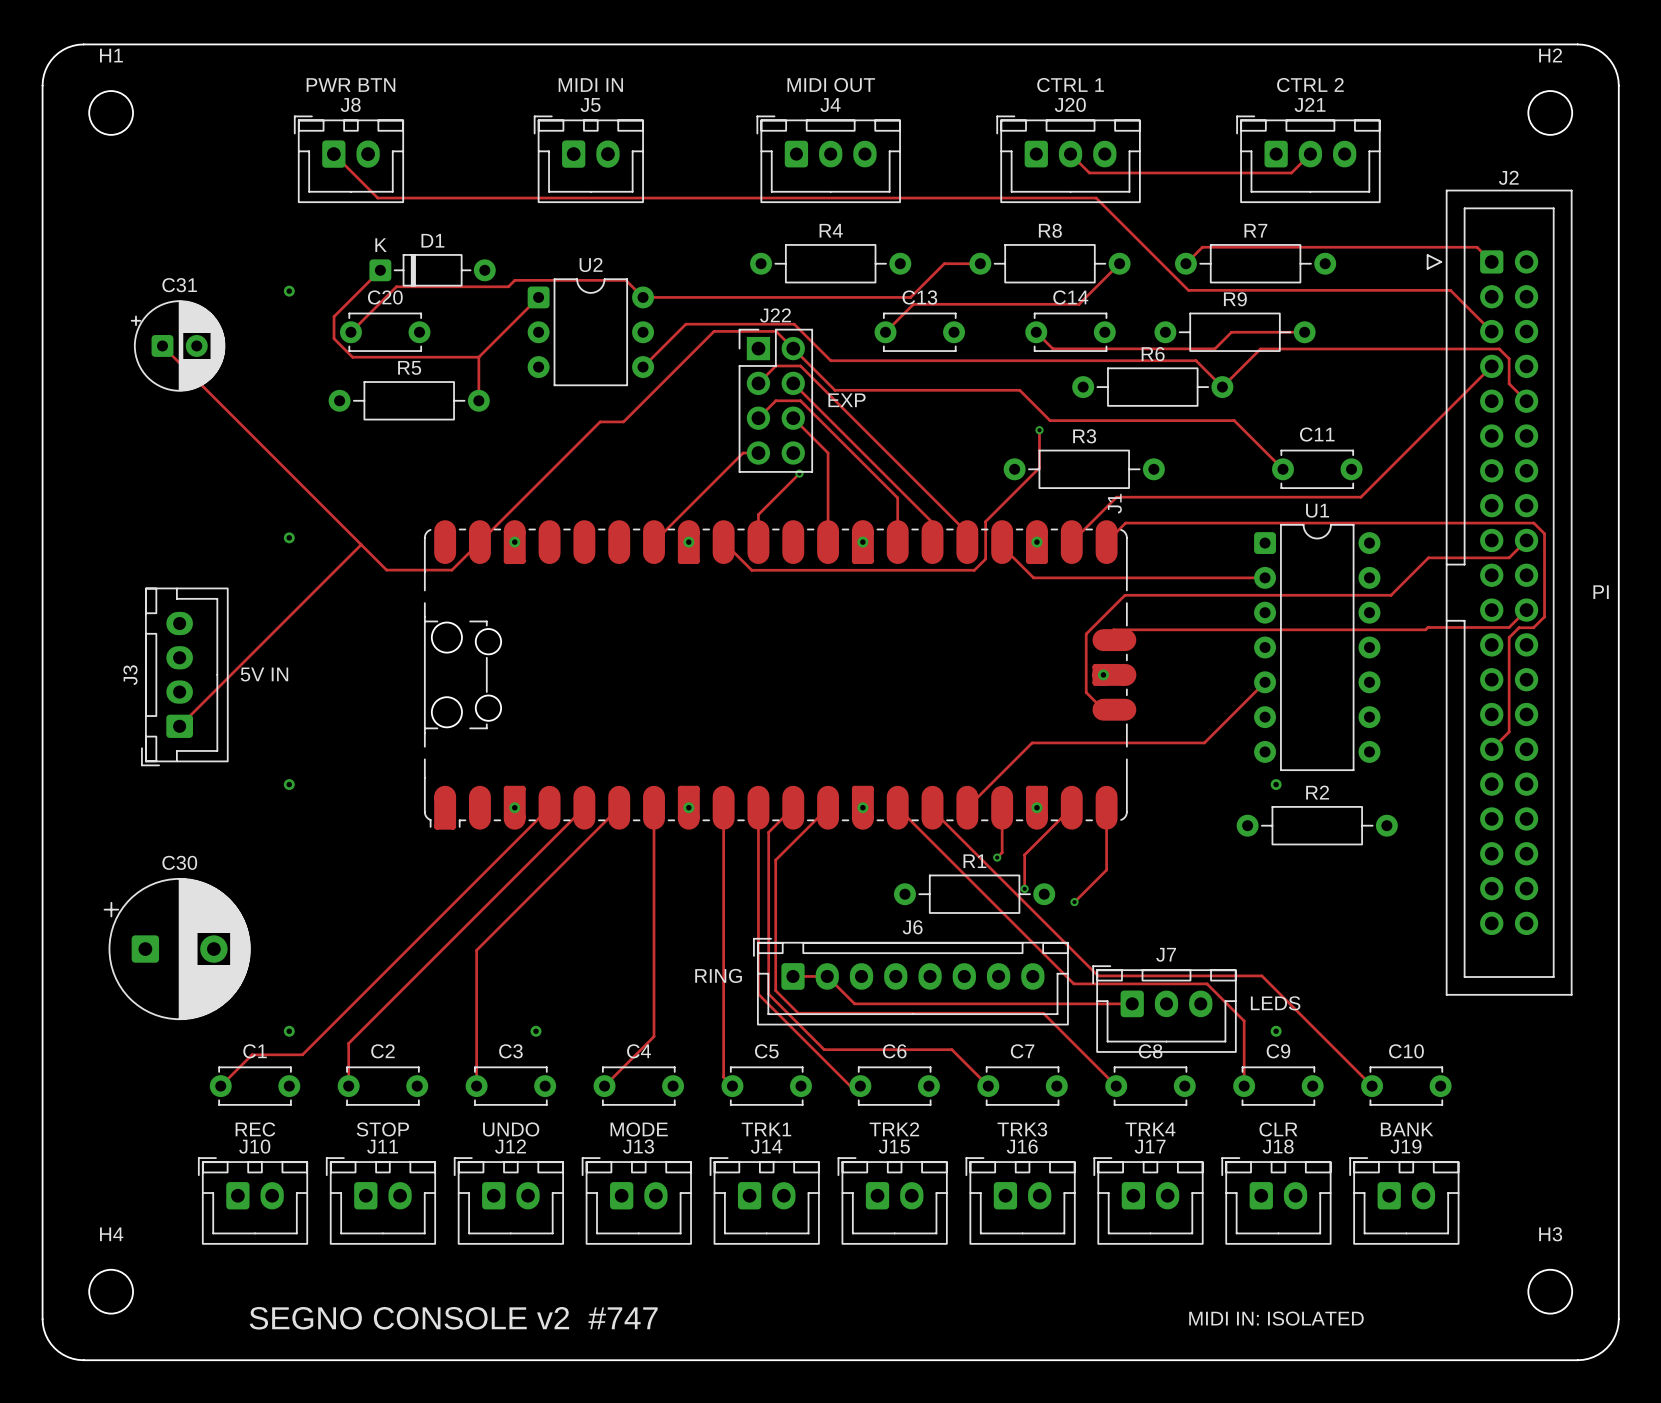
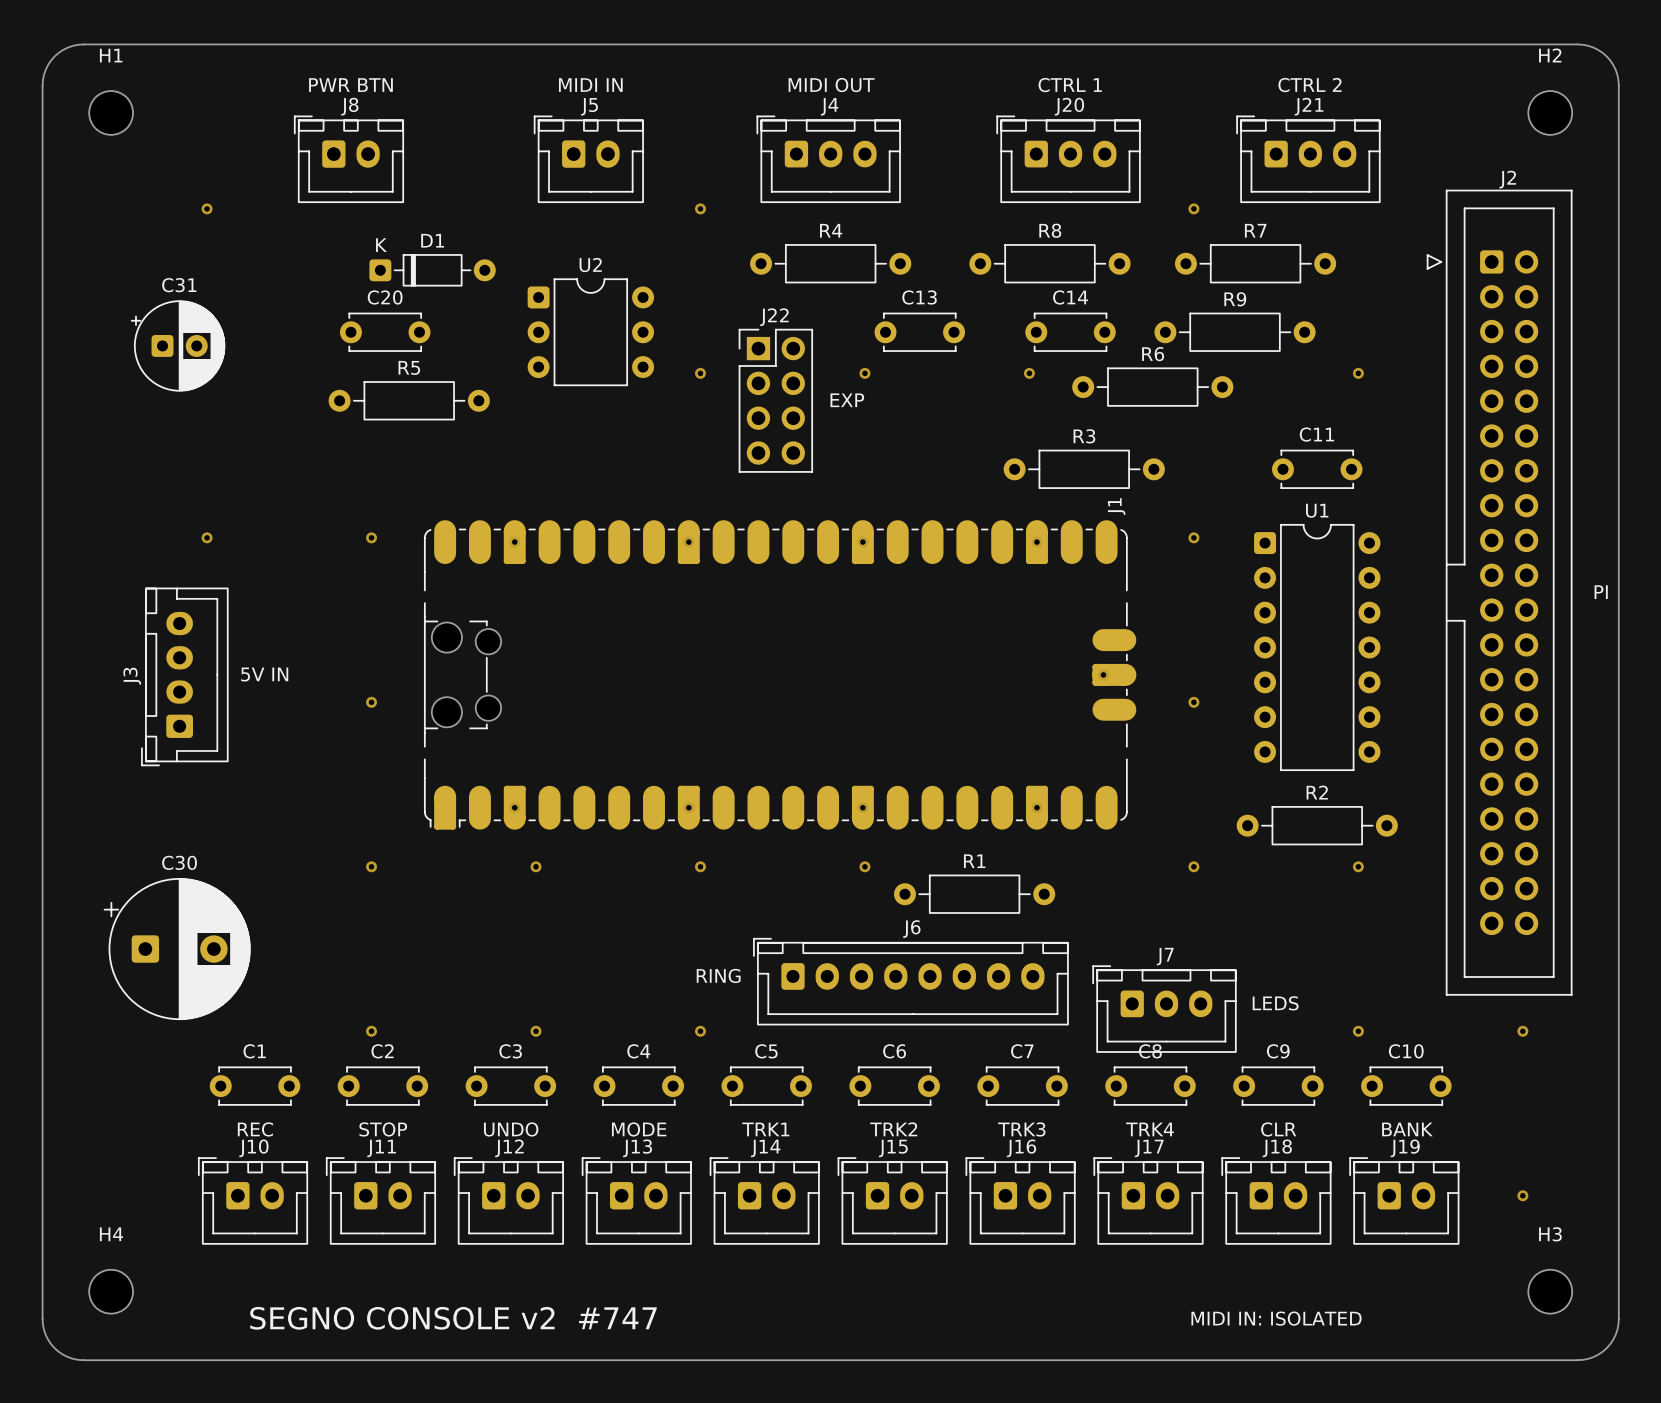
track: (333, 154) (377, 198) (1096, 198) (1188, 290) (1450, 290) (1491, 331) -> none
track: (1070, 154) (1089, 172) (1291, 172) (1310, 154) -> none
via: none -> (207, 208)
via: none -> (700, 208)
via: none -> (1193, 208)
track: (1491, 261) (1477, 247) (1202, 247) (1185, 263) -> none
track: (980, 263) (944, 263) (910, 297) (643, 297) (625, 280) (514, 280) (508, 286) (396, 286) (350, 332) -> none
track: (1119, 263) (1079, 304) (913, 304) (885, 332) -> none
track: (380, 270) (334, 316) (334, 338) (352, 357) (478, 357) -> none
via: (289, 291) -> none
track: (538, 297) (478, 357) -> none
track: (1036, 332) (1052, 348) (1214, 348) (1231, 332) (1304, 332) -> none
track: (162, 345) (386, 570) (451, 570) (600, 421) (623, 421) (714, 331) (776, 331) (835, 390) (1019, 390) (1050, 420) (1234, 420) (1282, 469) -> none
track: (478, 357) (478, 400) -> none
track: (1491, 366) (1360, 497) (1116, 497) (1071, 542) -> none
track: (643, 367) (685, 324) (794, 324) (830, 360) (1196, 360) (1222, 387) (1260, 348) (1499, 348) (1509, 358) (1509, 383) (1526, 401) -> none
via: none -> (700, 373)
via: none -> (864, 373)
via: none -> (1029, 373)
via: none -> (1358, 373)
track: (758, 383) (775, 365) (800, 365) (967, 532) (967, 542) -> none
track: (793, 383) (932, 522) (932, 542) -> none
track: (758, 418) (775, 400) (800, 400) (897, 497) (897, 542) -> none
track: (793, 418) (828, 453) (828, 542) -> none
track: (1039, 430) (1039, 467) (985, 521) (985, 559) (974, 570) (751, 570) (723, 542) -> none
via: (1039, 430) -> none
track: (758, 453) (743, 453) (654, 542) -> none
track: (799, 473) (758, 514) (758, 542) -> none
via: (799, 473) -> none
via: none -> (207, 537)
via: (289, 537) -> none
via: none -> (371, 537)
via: none -> (1193, 537)
track: (1526, 540) (1509, 557) (1428, 557) (1391, 595) (1124, 595) (1086, 634) (1086, 692) (1103, 709) -> none
track: (1002, 542) (1002, 546) (1033, 577) (1265, 577) -> none
track: (1106, 542) (1125, 523) (1533, 523) (1544, 533) (1544, 616) (1533, 627) (1519, 627) (1509, 637) (1509, 731) (1491, 749) -> none
track: (361, 544) (179, 726) -> none
track: (1526, 610) (1509, 627) (1428, 627) (1425, 629) (1113, 629) (1103, 640) -> none
track: (1265, 682) (1204, 742) (1032, 742) (967, 807) -> none
via: none -> (371, 702)
via: none -> (1193, 702)
via: (289, 784) -> none
via: (1276, 784) -> none
track: (549, 807) (302, 1054) (252, 1054) (220, 1086) -> none
track: (584, 807) (348, 1043) (348, 1086) -> none
track: (619, 807) (476, 950) (476, 1086) -> none
track: (654, 807) (654, 1036) (604, 1086) -> none
track: (723, 807) (723, 1077) (732, 1086) -> none
track: (758, 807) (758, 994) (850, 1086) (860, 1086) -> none
track: (793, 807) (768, 832) (768, 994) (824, 1049) (951, 1049) (988, 1086) -> none
track: (828, 807) (775, 860) (775, 990) (798, 1013) (1043, 1013) (1116, 1086) -> none
track: (897, 807) (1073, 983) (1207, 983) (1244, 1021) (1244, 1086) -> none
track: (932, 807) (932, 810) (1098, 975) (1261, 975) (1372, 1086) -> none
track: (1002, 807) (1002, 852) (997, 857) -> none
track: (1071, 807) (1024, 854) (1024, 888) -> none
track: (1106, 807) (1106, 870) (1074, 902) -> none
via: (997, 857) -> none
via: none -> (371, 866)
via: none -> (536, 866)
via: none -> (700, 866)
via: none -> (864, 866)
via: none -> (1193, 866)
via: none -> (1358, 866)
via: (1024, 888) -> none
via: (1074, 902) -> none
track: (792, 976) (827, 976) (854, 1003) (1132, 1003) -> none
via position: (289, 1031) -> (371, 1031)
via: none -> (700, 1031)
via position: (1276, 1031) -> (1358, 1031)
via: none -> (1522, 1031)
via: none -> (1522, 1195)

